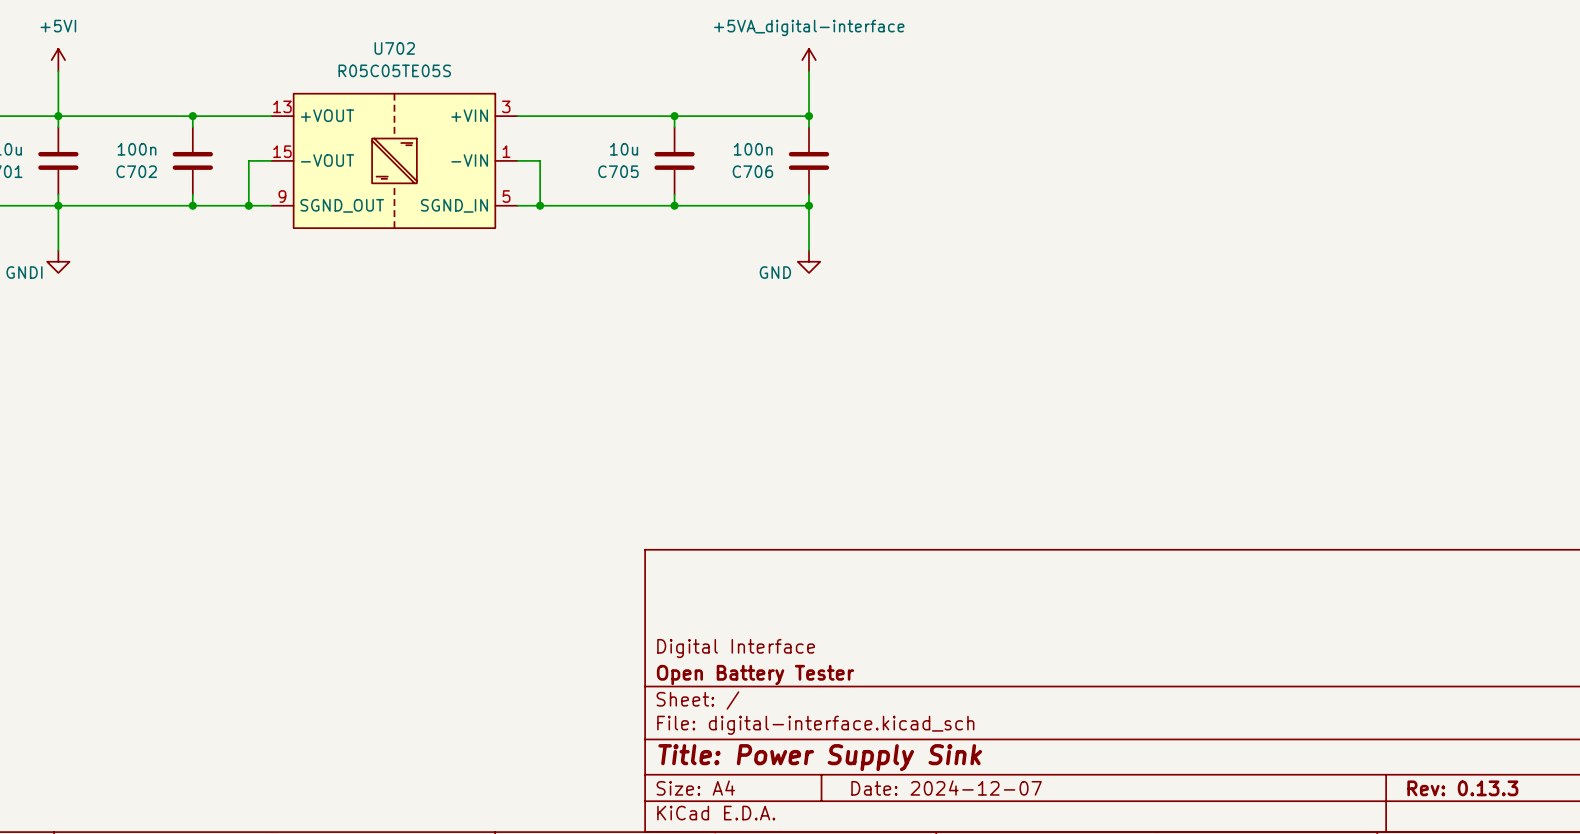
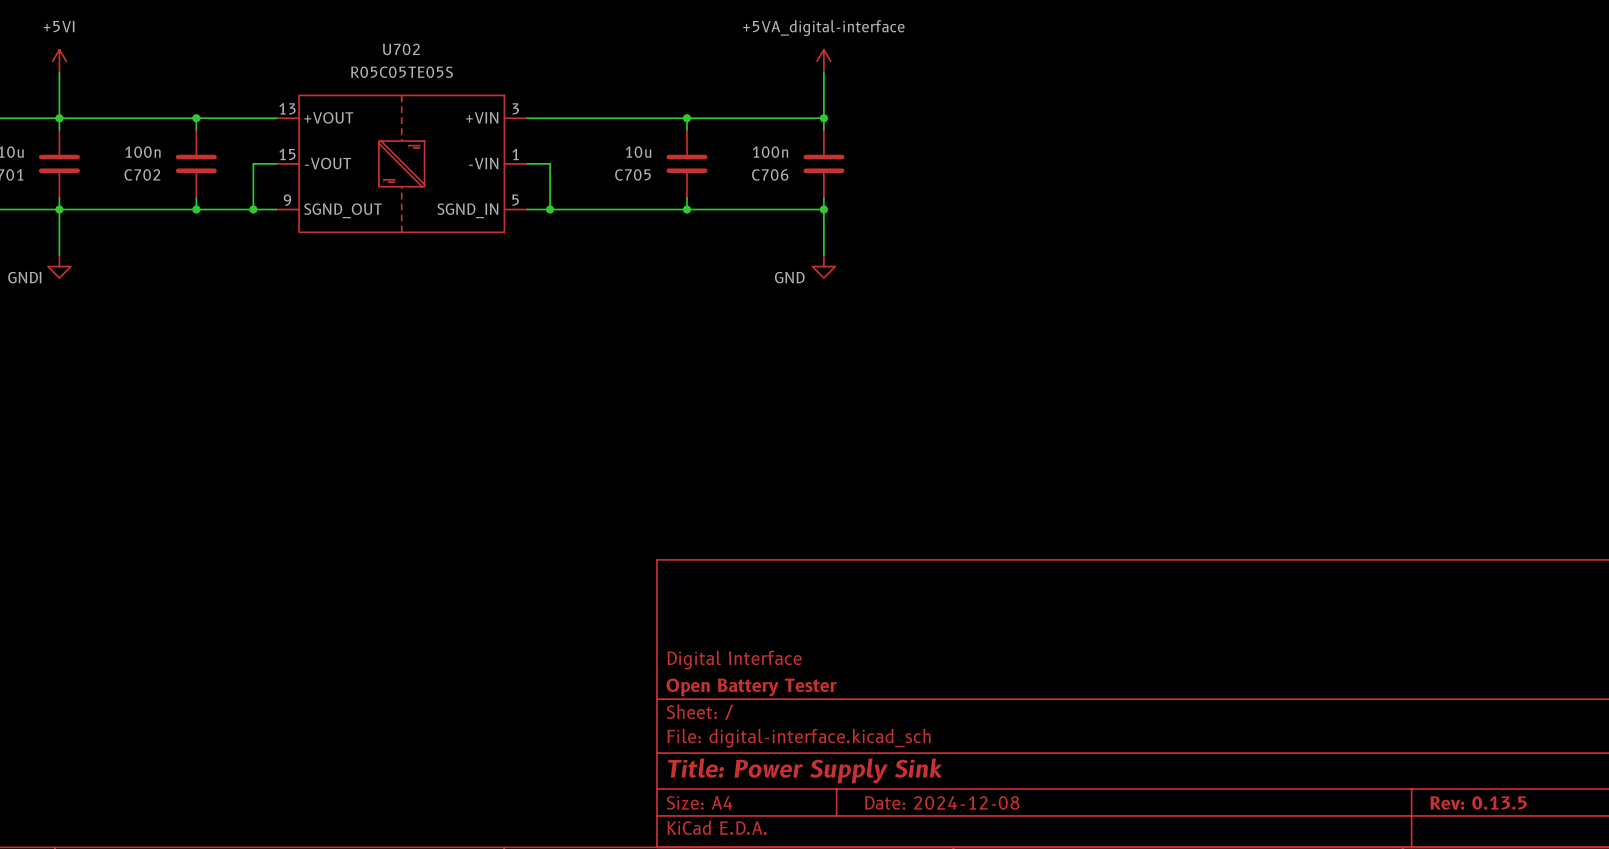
title block: Date: 2024-12-07 (946, 788) -> Date: 2024-12-08 (942, 802)
title block: Rev: 0.13.3 (1462, 788) -> Rev: 0.13.5 (1478, 802)

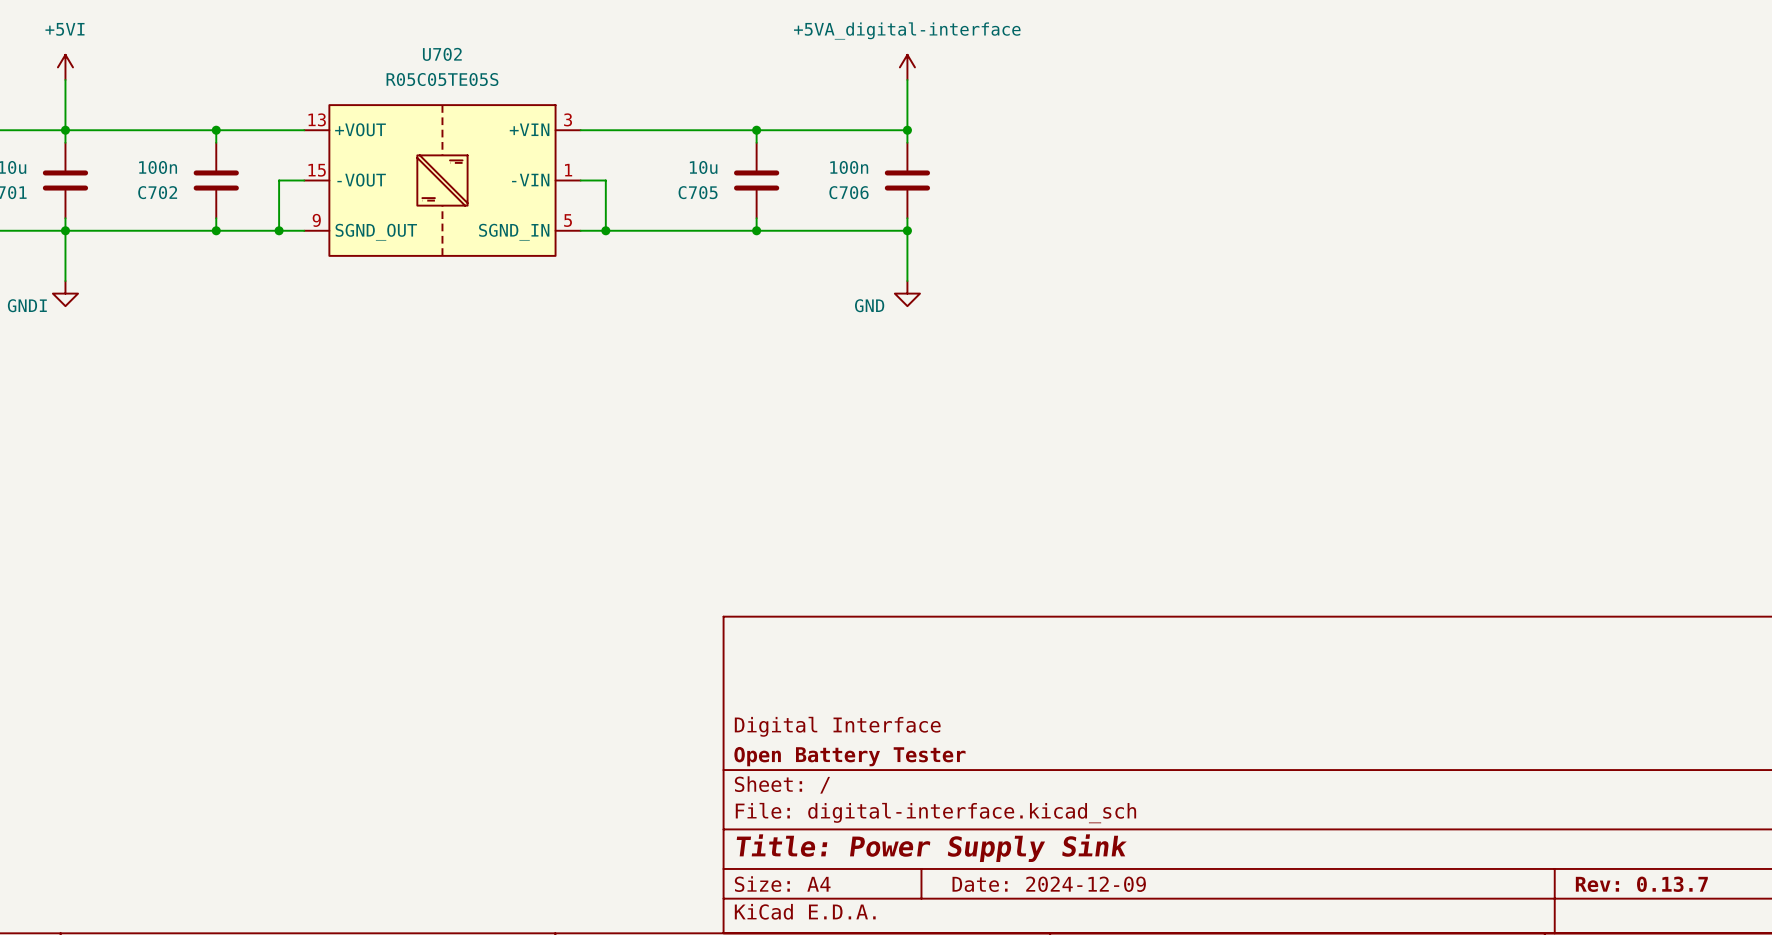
title block: Date: 2024-12-08 (942, 802) -> Date: 2024-12-09 (1049, 884)
title block: Rev: 0.13.5 (1478, 802) -> Rev: 0.13.7 (1641, 884)

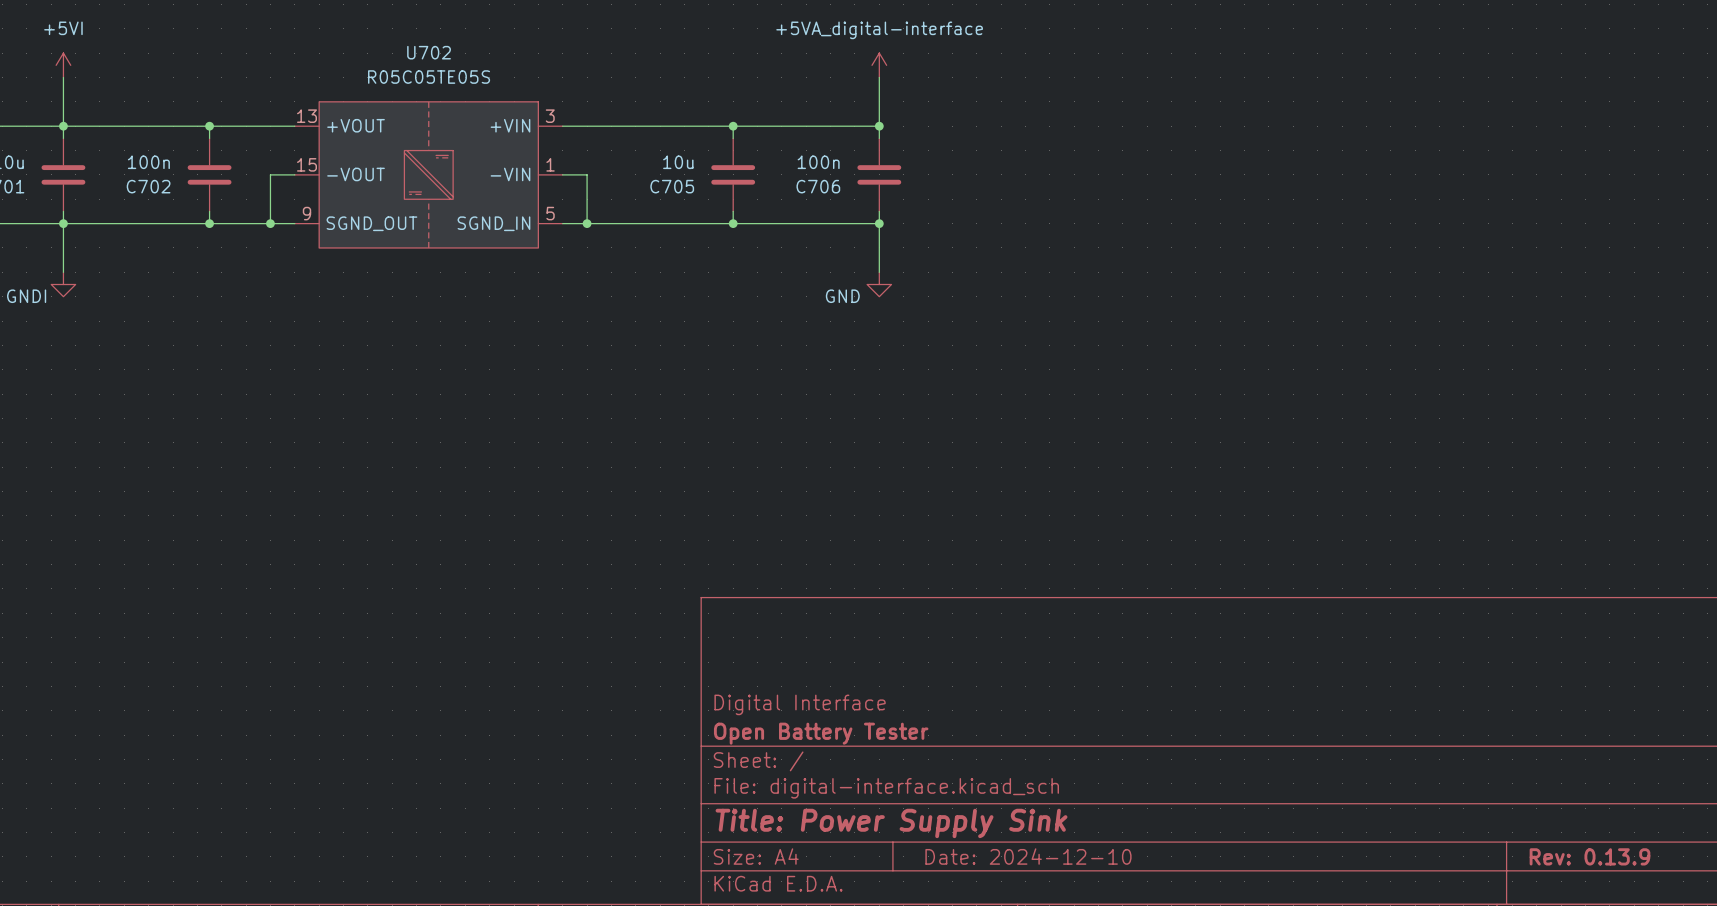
title block: Date: 2024-12-09 (1049, 884) -> Date: 2024-12-10 (1028, 856)
title block: Rev: 0.13.7 (1641, 884) -> Rev: 0.13.9 (1589, 856)

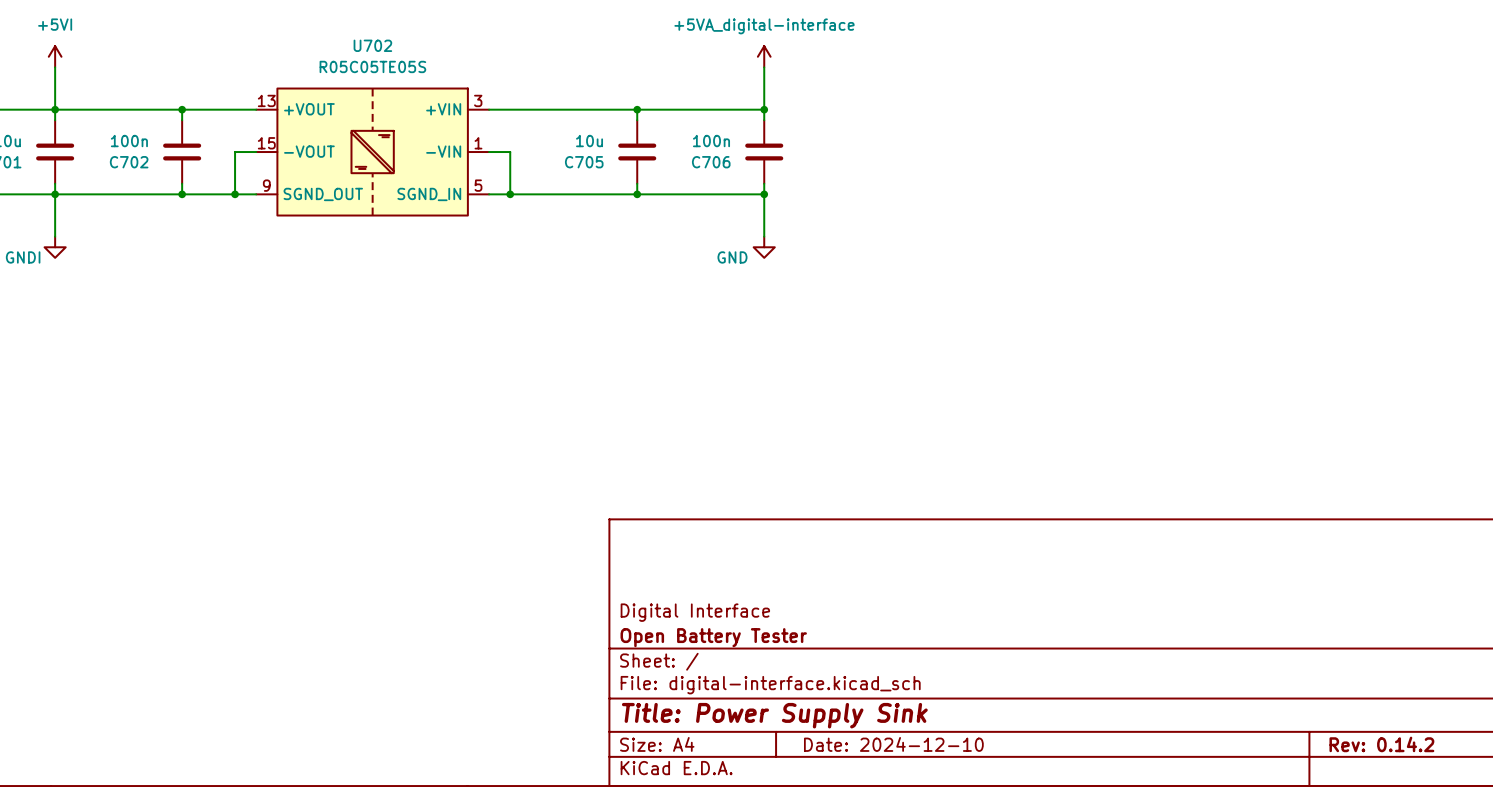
title block: Rev: 0.13.9 (1589, 856) -> Rev: 0.14.2 (1381, 744)

